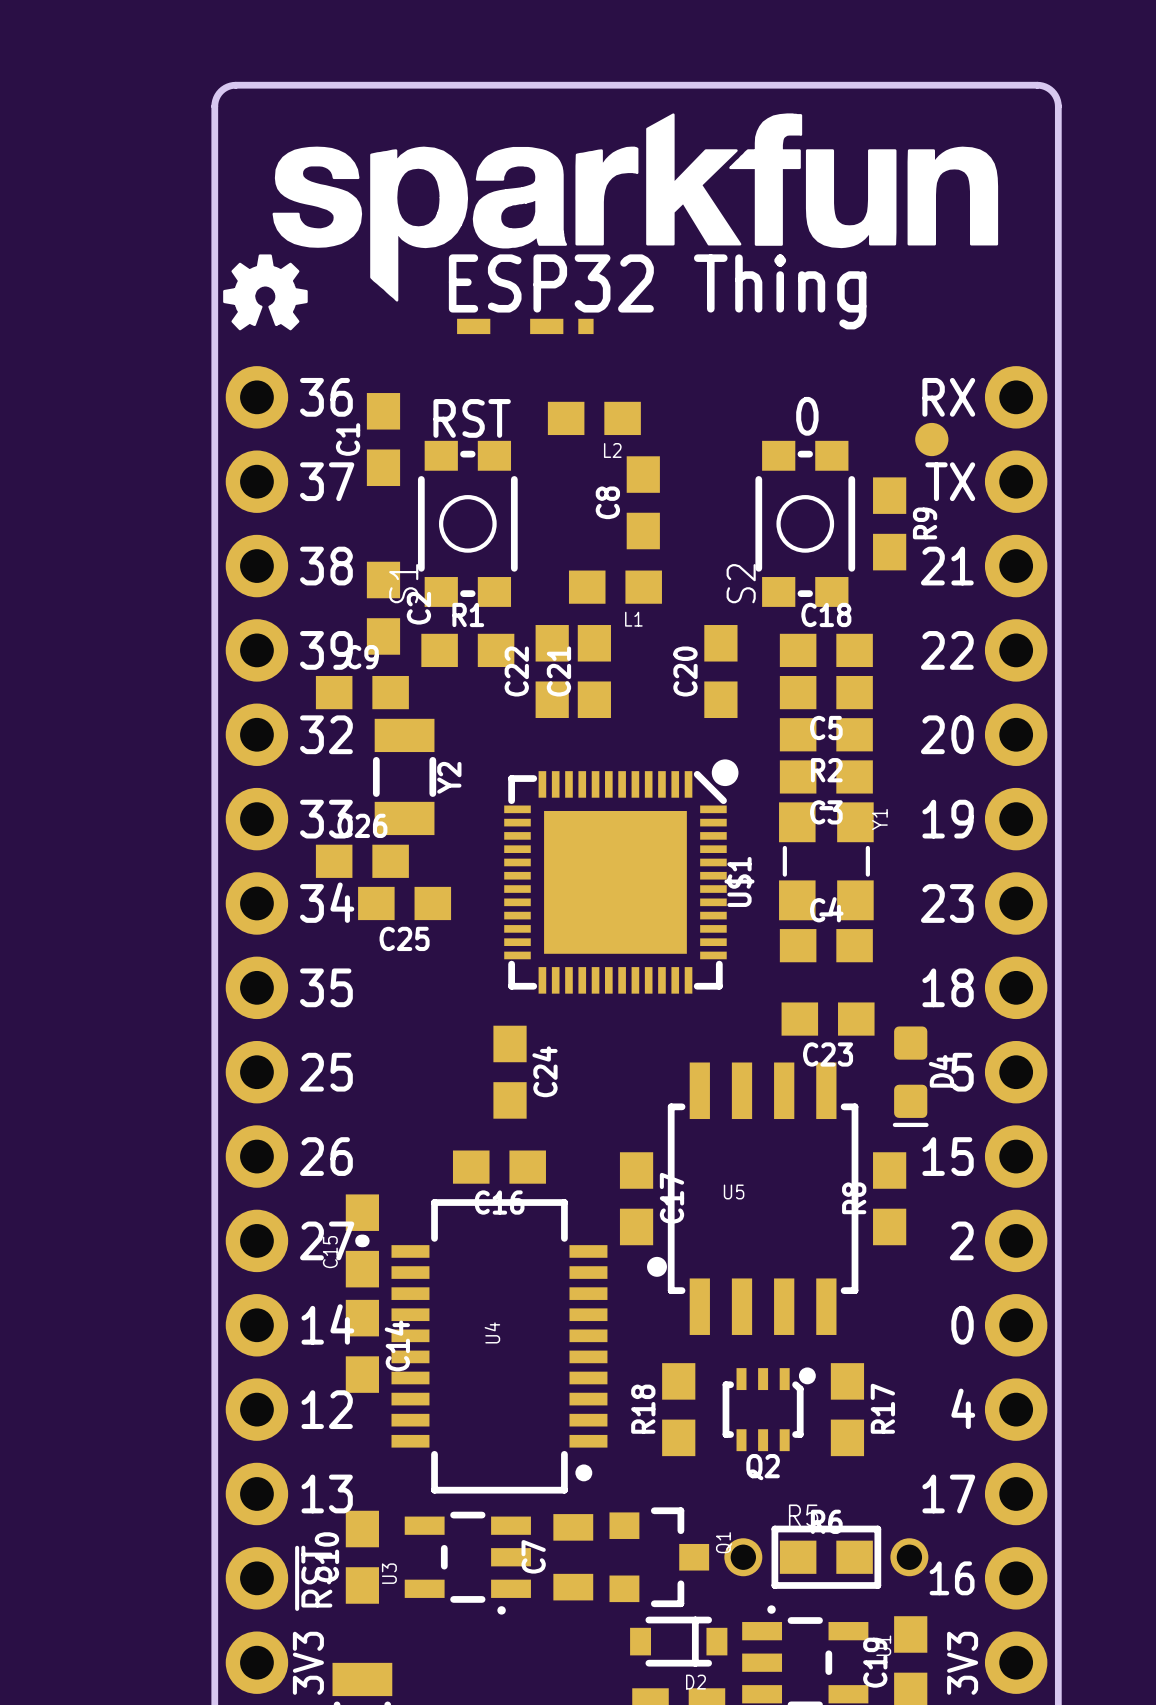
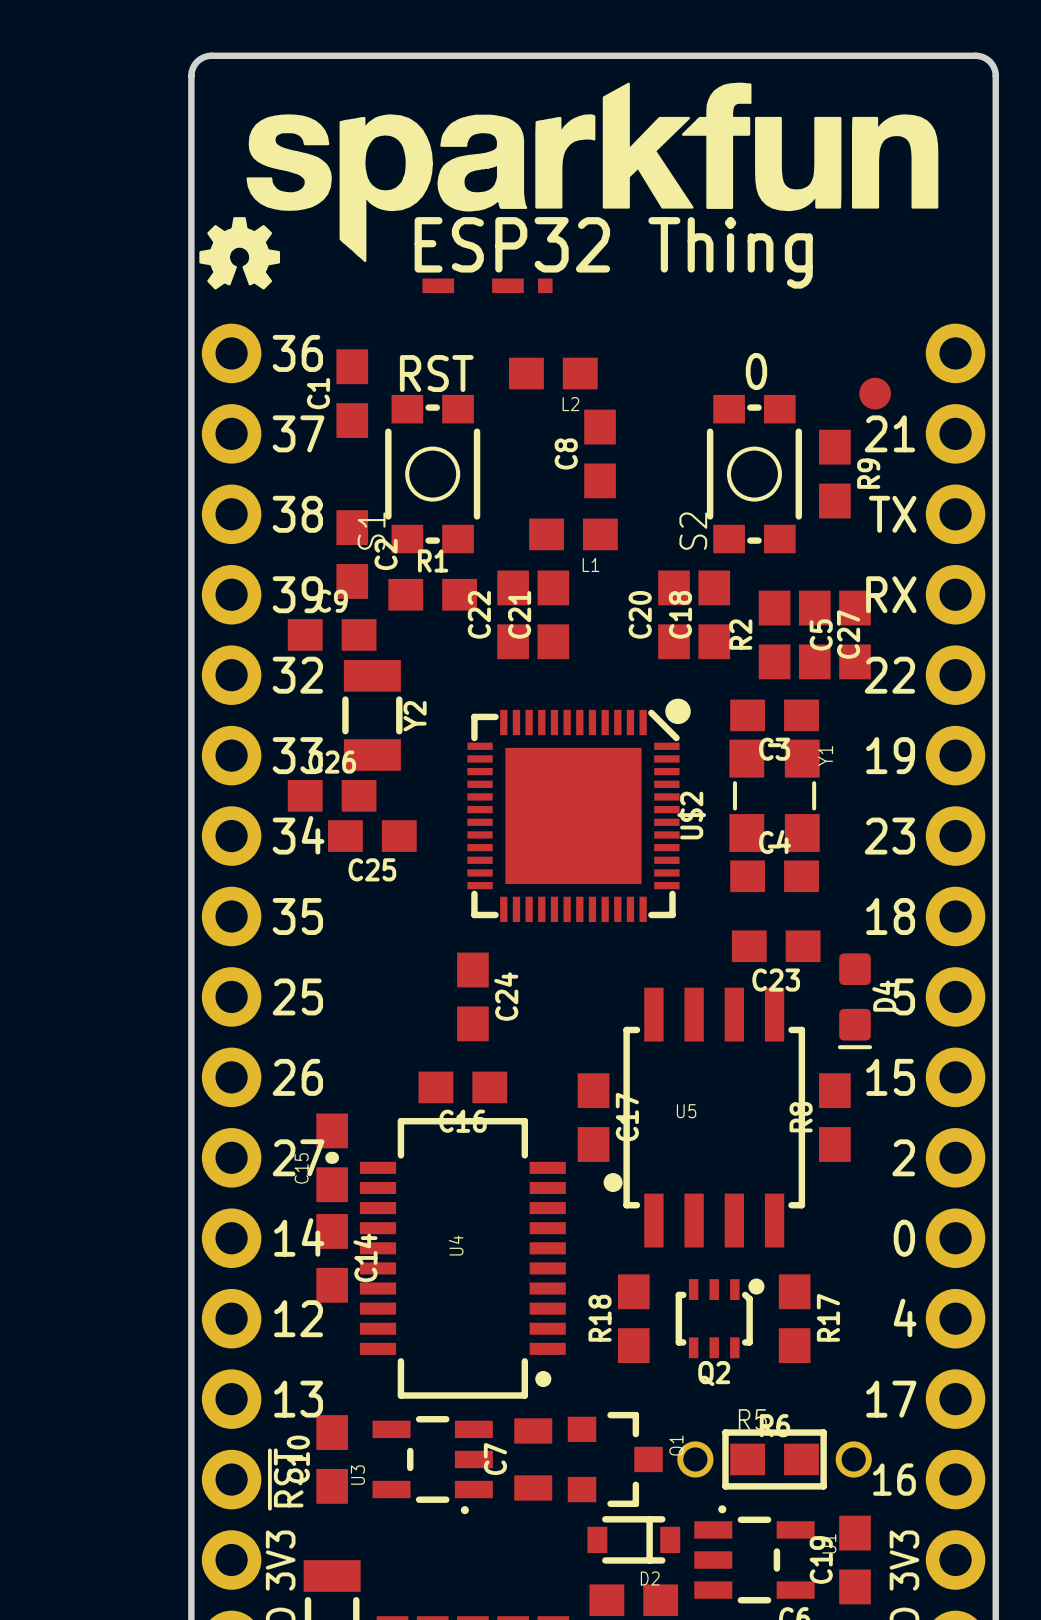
text: RX (948, 397) -> none
text: TX (950, 481) -> 21 (889, 433)
text: 21 (947, 566) -> TX (892, 514)
C18 rotation: 0° (826, 650) -> 90° clockwise (714, 614)
C18 position: (826, 650) -> (714, 614)
text: 22 (947, 650) -> RX (891, 594)
C5 rotation: 0° (826, 692) -> 90° clockwise (855, 634)
C5 position: (826, 692) -> (855, 634)
C27: none -> (814, 634)
R2 rotation: 0° (826, 734) -> 90° clockwise (774, 634)
text: 20 (947, 734) -> 22 (889, 675)
U$1 name: U$1 (739, 881) -> U$2 (691, 815)

